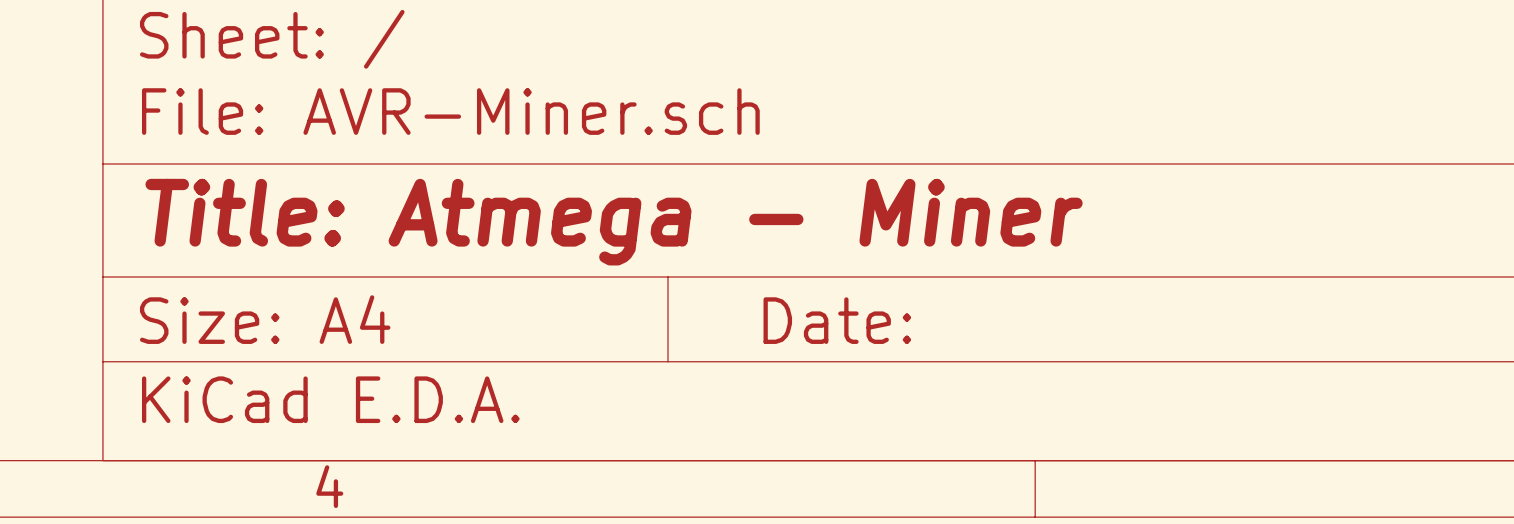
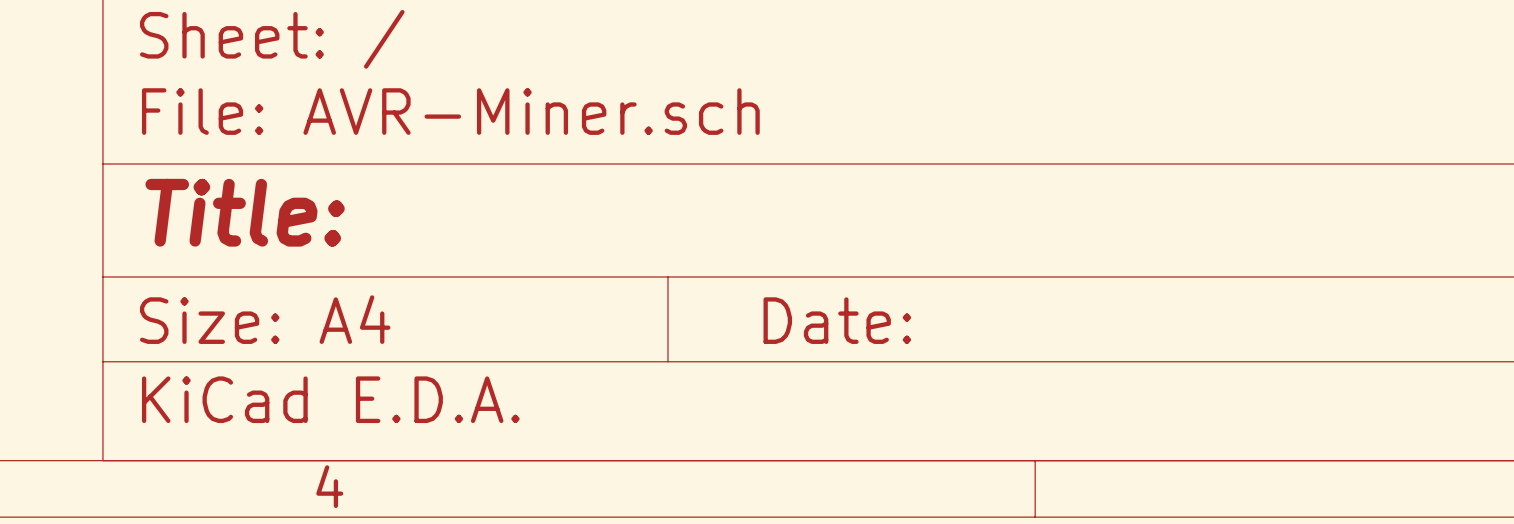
title block: Title: Atmega - Miner (614, 222) -> Title: (245, 212)

